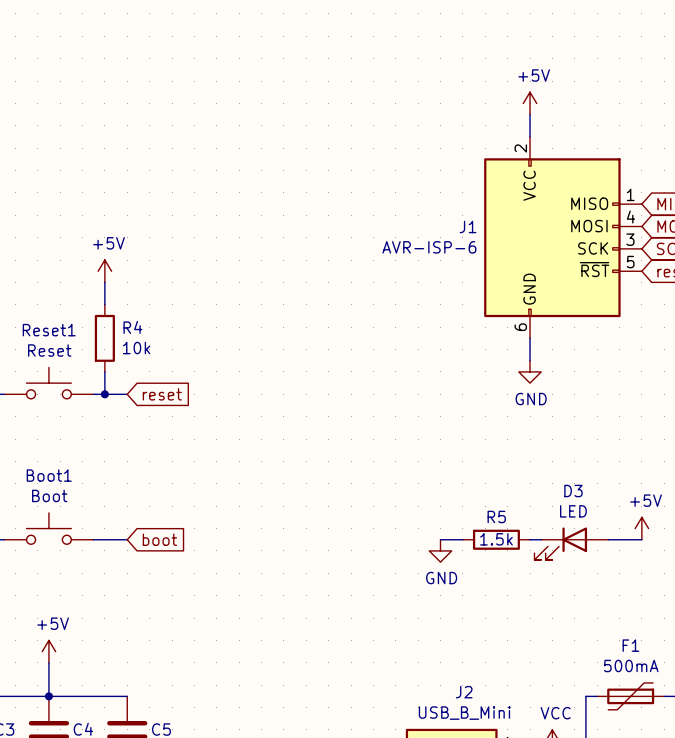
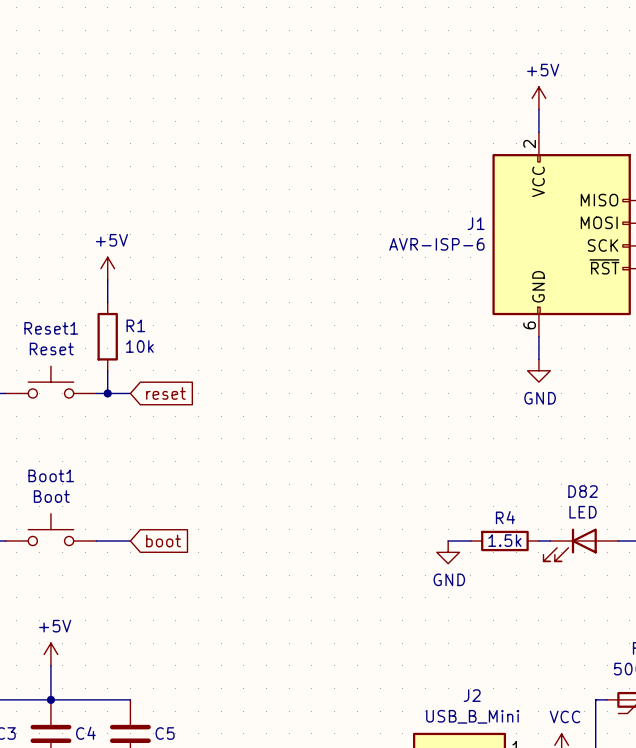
R4 name: R4 (132, 327) -> R1 (135, 325)
D3 name: D3 (573, 491) -> D82 (583, 491)
R5 name: R5 (496, 516) -> R4 (505, 517)

